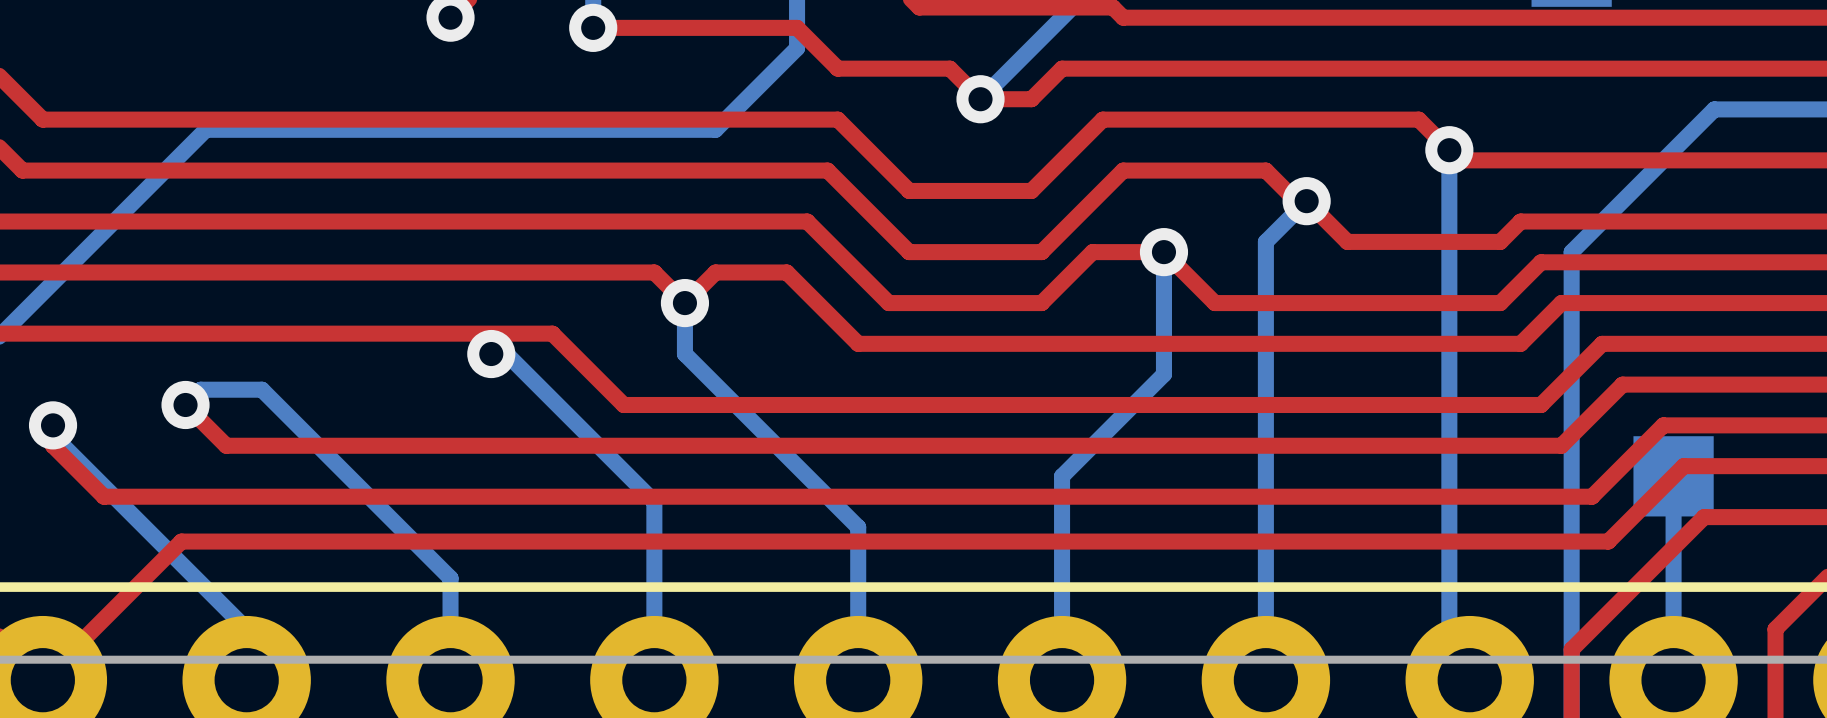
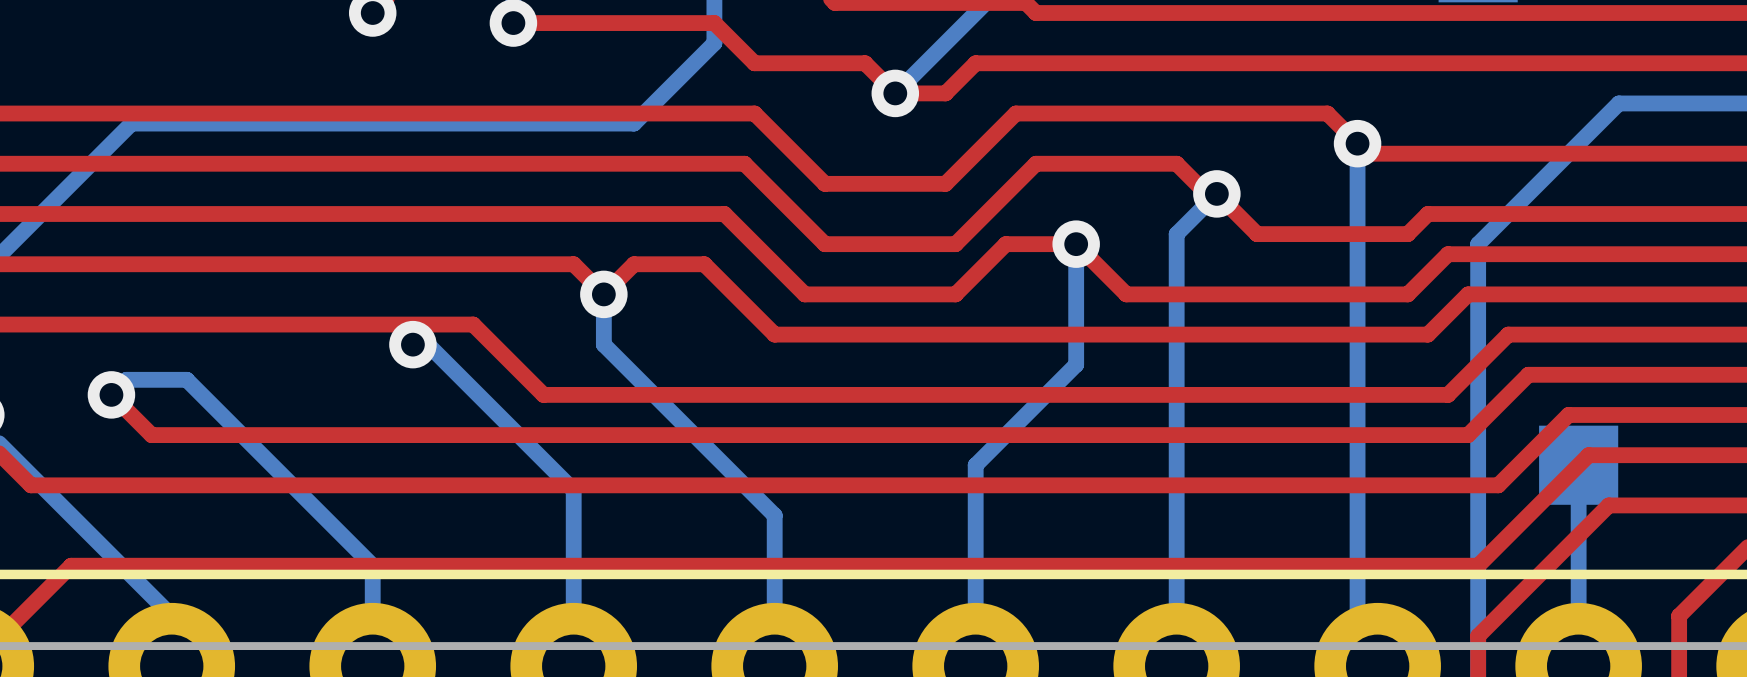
top track: (1608, 541) (181, 541) (144, 578) -> (1514, 529) (1478, 565) (71, 565)

